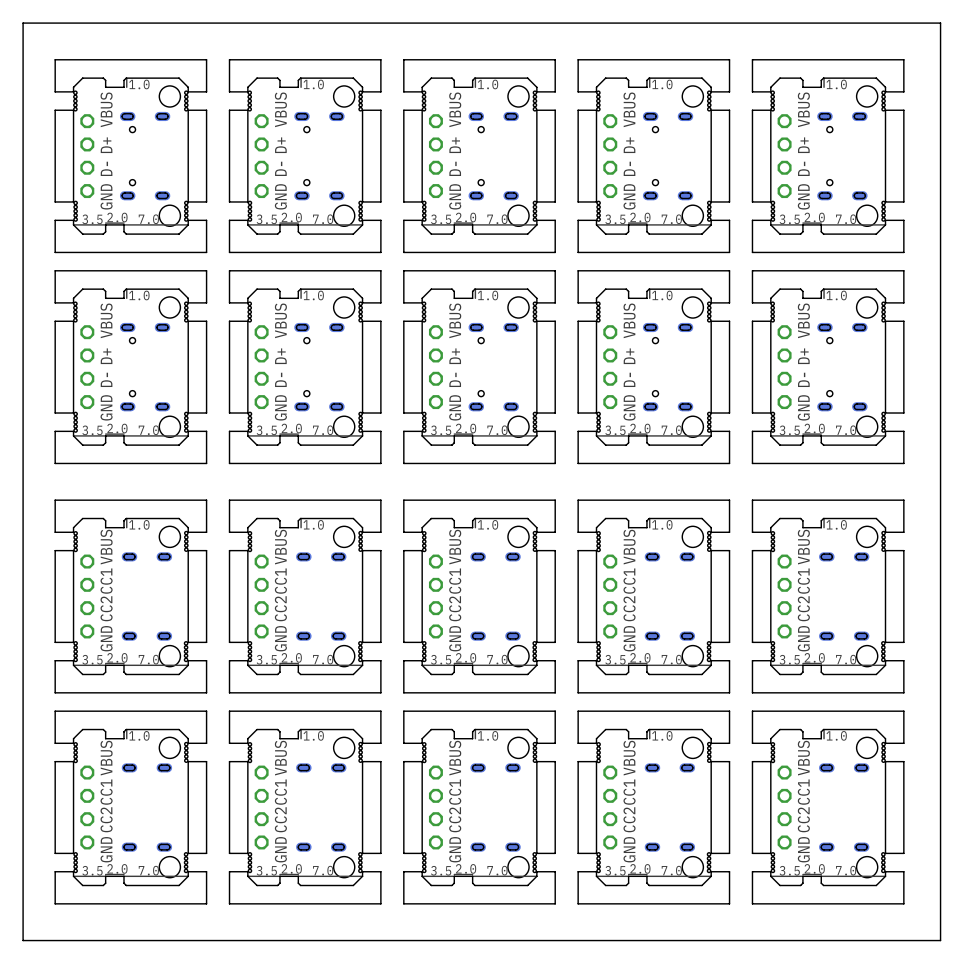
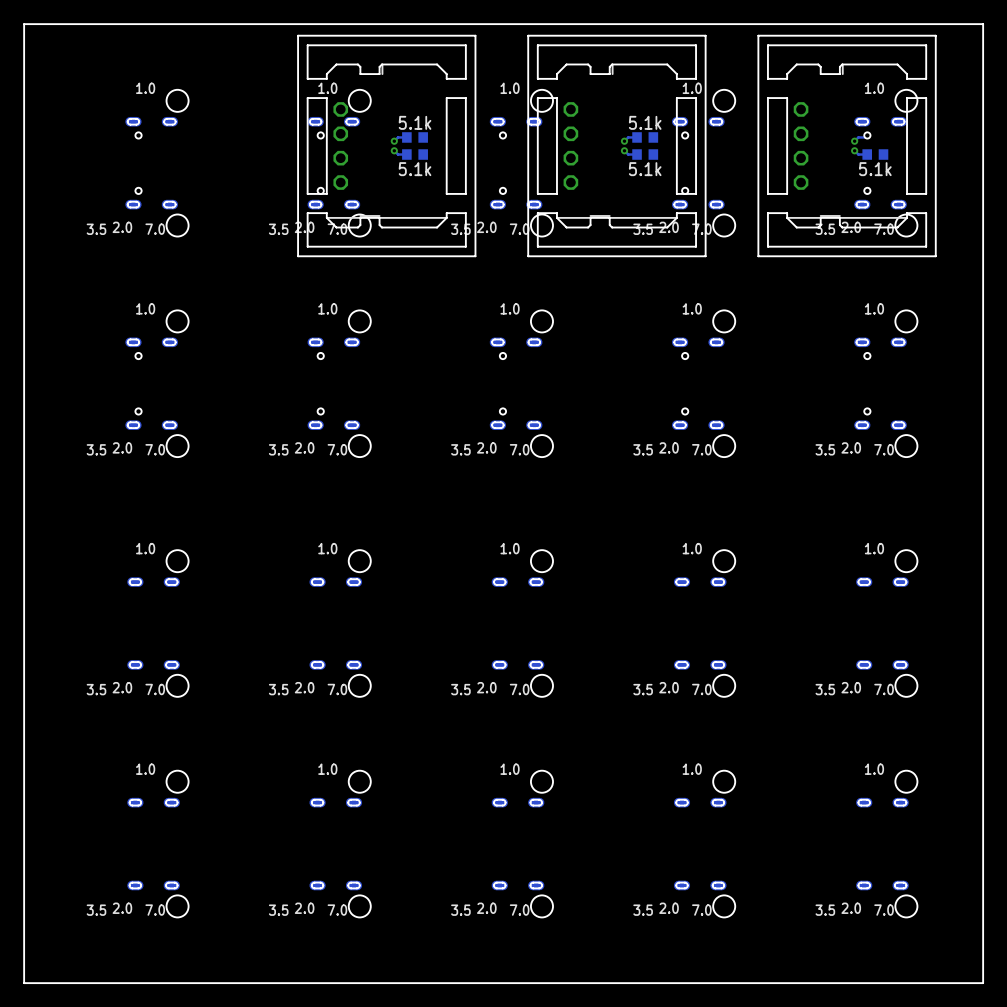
board edge: none -> (475, 35) (298, 35) (298, 256) (475, 256) (475, 35)
board edge: none -> (705, 35) (528, 35) (528, 256) (705, 256) (705, 35)
board edge: none -> (935, 35) (758, 35) (758, 256) (935, 256) (935, 35)
board edge: (206, 59) (55, 59) (55, 91) (73, 91) (73, 87) (82, 78) (103, 78) (105, 80) (105, 87) (124, 87) (124, 80) (126, 78) (179, 78) (188, 87) (188, 91) (206, 91) (206, 59) -> none
board edge: (380, 59) (229, 59) (229, 91) (247, 91) (247, 87) (257, 78) (277, 78) (279, 80) (279, 87) (298, 87) (298, 80) (300, 78) (353, 78) (362, 87) (362, 91) (380, 91) (380, 59) -> (465, 45) (307, 45) (307, 78) (326, 78) (326, 74) (336, 64) (357, 64) (360, 66) (360, 74) (379, 74) (379, 66) (381, 64) (437, 64) (446, 74) (446, 78) (465, 78) (465, 45)
board edge: (555, 59) (403, 59) (403, 91) (422, 91) (422, 87) (431, 78) (451, 78) (454, 80) (454, 87) (472, 87) (472, 80) (474, 78) (527, 78) (536, 87) (536, 91) (555, 91) (555, 59) -> none
board edge: (729, 59) (578, 59) (578, 91) (596, 91) (596, 87) (605, 78) (626, 78) (628, 80) (628, 87) (646, 87) (646, 80) (649, 78) (702, 78) (711, 87) (711, 91) (729, 91) (729, 59) -> (696, 45) (537, 45) (537, 78) (556, 78) (556, 74) (566, 64) (588, 64) (590, 66) (590, 74) (609, 74) (609, 66) (612, 64) (667, 64) (676, 74) (676, 78) (696, 78) (696, 45)
board edge: (903, 59) (903, 91) (885, 91) (885, 87) (876, 78) (823, 78) (821, 80) (821, 87) (802, 87) (802, 80) (800, 78) (779, 78) (770, 87) (770, 91) (752, 91) (752, 59) (903, 59) -> (926, 45) (926, 78) (907, 78) (907, 74) (897, 64) (842, 64) (839, 66) (839, 74) (820, 74) (820, 66) (818, 64) (796, 64) (787, 74) (787, 78) (767, 78) (767, 45) (926, 45)
line: (126, 78) (126, 87) -> none
line: (301, 78) (301, 87) -> (382, 64) (382, 74)
line: (475, 78) (475, 87) -> none
line: (649, 78) (649, 87) -> (612, 64) (612, 74)
line: (824, 78) (824, 87) -> (842, 64) (842, 74)
hole: (75, 92) -> none
hole: (186, 92) -> none
hole: (249, 92) -> none
hole: (360, 92) -> none
hole: (424, 92) -> none
hole: (534, 92) -> none
hole: (598, 92) -> none
hole: (709, 92) -> none
hole: (772, 92) -> none
hole: (883, 92) -> none
hole: (75, 96) -> none
hole: (186, 96) -> none
hole: (249, 96) -> none
hole: (360, 96) -> none
hole: (424, 96) -> none
hole: (534, 96) -> none
hole: (598, 96) -> none
hole: (709, 96) -> none
hole: (772, 96) -> none
hole: (883, 96) -> none
hole: (75, 101) -> none
hole: (186, 101) -> none
hole: (249, 101) -> none
hole: (360, 101) -> none
hole: (424, 101) -> none
hole: (534, 101) -> none
hole: (598, 101) -> none
hole: (709, 101) -> none
hole: (772, 101) -> none
hole: (883, 101) -> none
hole: (75, 105) -> none
hole: (186, 105) -> none
hole: (249, 105) -> none
hole: (360, 105) -> none
hole: (424, 105) -> none
hole: (534, 105) -> none
hole: (598, 105) -> none
hole: (709, 105) -> none
hole: (772, 105) -> none
hole: (883, 105) -> none
hole: (75, 109) -> none
text: VBUS (106, 109) -> none
hole: (186, 109) -> none
hole: (249, 109) -> none
text: VBUS (280, 109) -> none
hole: (360, 109) -> none
hole: (424, 109) -> none
text: VBUS (455, 109) -> none
hole: (534, 109) -> none
hole: (598, 109) -> none
text: VBUS (629, 109) -> none
hole: (709, 109) -> none
hole: (772, 109) -> none
text: VBUS (803, 109) -> none
hole: (883, 109) -> none
board edge: (73, 110) (55, 110) (55, 201) (73, 201) (73, 110) -> none
board edge: (206, 110) (188, 110) (188, 201) (206, 201) (206, 110) -> none
board edge: (247, 110) (229, 110) (229, 201) (247, 201) (247, 110) -> (326, 98) (307, 98) (307, 193) (326, 193) (326, 98)
board edge: (380, 110) (362, 110) (362, 201) (380, 201) (380, 110) -> (465, 98) (446, 98) (446, 193) (465, 193) (465, 98)
board edge: (422, 110) (403, 110) (403, 201) (422, 201) (422, 110) -> none
board edge: (555, 110) (536, 110) (536, 201) (555, 201) (555, 110) -> none
board edge: (596, 110) (578, 110) (578, 201) (596, 201) (596, 110) -> (556, 98) (537, 98) (537, 193) (556, 193) (556, 98)
board edge: (729, 110) (711, 110) (711, 201) (729, 201) (729, 110) -> (696, 98) (676, 98) (676, 193) (696, 193) (696, 98)
board edge: (770, 110) (770, 201) (752, 201) (752, 110) (770, 110) -> (787, 98) (787, 193) (767, 193) (767, 98) (787, 98)
board edge: (903, 110) (903, 201) (885, 201) (885, 110) (903, 110) -> (926, 98) (926, 193) (907, 193) (907, 98) (926, 98)
track: none -> (406, 137) (398, 137) (394, 141)
part: none -> 5.1k (415, 137)
track: none -> (637, 137) (628, 137) (624, 141)
part: none -> 5.1k (645, 137)
track: none -> (867, 137) (858, 137) (854, 141)
via: none -> (394, 141)
via: none -> (624, 141)
via: none -> (854, 141)
part: none -> (340, 145)
part: none -> (570, 145)
track: none -> (394, 150) (398, 154) (406, 154)
via: none -> (394, 150)
track: none -> (624, 150) (628, 154) (637, 154)
via: none -> (624, 150)
track: none -> (854, 150) (858, 154) (867, 154)
via: none -> (854, 150)
text: D+ (106, 145) -> none
text: D+ (280, 145) -> none
text: D+ (455, 145) -> none
text: D+ (629, 145) -> none
text: D+ (803, 145) -> none
part: none -> 5.1k (415, 154)
part: none -> 5.1k (645, 154)
part: none -> 5.1k (875, 154)
part: (87, 156) -> none
part: (261, 156) -> none
part: (435, 156) -> none
part: (610, 156) -> none
part position: (784, 156) -> (801, 145)
text: D- (106, 168) -> none
text: D- (280, 168) -> none
text: D- (455, 168) -> none
text: D- (629, 168) -> none
text: D- (803, 168) -> none
text: GND (106, 196) -> none
text: GND (280, 196) -> none
text: GND (455, 196) -> none
text: GND (629, 196) -> none
text: GND (803, 196) -> none
hole: (75, 202) -> none
hole: (186, 202) -> none
hole: (249, 202) -> none
hole: (360, 202) -> none
hole: (424, 202) -> none
hole: (534, 202) -> none
hole: (598, 202) -> none
hole: (709, 202) -> none
hole: (772, 202) -> none
hole: (883, 202) -> none
hole: (75, 207) -> none
hole: (186, 207) -> none
hole: (249, 207) -> none
hole: (360, 207) -> none
hole: (424, 207) -> none
hole: (534, 207) -> none
hole: (598, 207) -> none
hole: (709, 207) -> none
hole: (772, 207) -> none
hole: (883, 207) -> none
hole: (75, 211) -> none
hole: (186, 211) -> none
hole: (249, 211) -> none
hole: (360, 211) -> none
hole: (424, 211) -> none
hole: (534, 211) -> none
hole: (598, 211) -> none
hole: (709, 211) -> none
hole: (772, 211) -> none
hole: (883, 211) -> none
hole: (75, 215) -> none
hole: (186, 215) -> none
hole: (249, 215) -> none
hole: (360, 215) -> none
hole: (424, 215) -> none
hole: (534, 215) -> none
hole: (598, 215) -> none
hole: (709, 215) -> none
hole: (772, 215) -> none
hole: (883, 215) -> none
hole: (75, 219) -> none
hole: (186, 219) -> none
hole: (249, 219) -> none
hole: (360, 219) -> none
hole: (424, 219) -> none
hole: (534, 219) -> none
hole: (598, 219) -> none
hole: (709, 219) -> none
hole: (772, 219) -> none
hole: (883, 219) -> none
board edge: (206, 220) (188, 220) (188, 224) (179, 234) (126, 234) (124, 231) (124, 224) (105, 224) (105, 231) (103, 234) (82, 234) (73, 224) (73, 220) (55, 220) (55, 252) (206, 252) (206, 220) -> none
board edge: (380, 220) (362, 220) (362, 224) (353, 234) (300, 234) (298, 231) (298, 224) (279, 224) (279, 231) (277, 234) (257, 234) (247, 224) (247, 220) (229, 220) (229, 252) (380, 252) (380, 220) -> (465, 213) (446, 213) (446, 217) (437, 227) (381, 227) (379, 225) (379, 217) (360, 217) (360, 225) (357, 227) (336, 227) (326, 217) (326, 213) (307, 213) (307, 246) (465, 246) (465, 213)
board edge: (555, 220) (536, 220) (536, 224) (527, 234) (474, 234) (472, 231) (472, 224) (454, 224) (454, 231) (451, 234) (431, 234) (422, 224) (422, 220) (403, 220) (403, 252) (555, 252) (555, 220) -> none
board edge: (729, 220) (711, 220) (711, 224) (702, 234) (649, 234) (646, 231) (646, 224) (628, 224) (628, 231) (626, 234) (605, 234) (596, 224) (596, 220) (578, 220) (578, 252) (729, 252) (729, 220) -> (696, 213) (676, 213) (676, 217) (667, 227) (612, 227) (609, 225) (609, 217) (590, 217) (590, 225) (588, 227) (566, 227) (556, 217) (556, 213) (537, 213) (537, 246) (696, 246) (696, 213)
board edge: (903, 220) (903, 252) (752, 252) (752, 220) (770, 220) (770, 224) (779, 234) (800, 234) (802, 231) (802, 224) (821, 224) (821, 231) (823, 234) (876, 234) (885, 224) (885, 220) (903, 220) -> (926, 213) (926, 246) (767, 246) (767, 213) (787, 213) (787, 217) (796, 227) (818, 227) (820, 225) (820, 217) (839, 217) (839, 225) (842, 227) (897, 227) (907, 217) (907, 213) (926, 213)
line: (124, 223) (105, 223) -> none
line: (298, 223) (279, 223) -> (379, 216) (360, 216)
line: (472, 223) (454, 223) -> none
line: (646, 223) (628, 223) -> (609, 216) (590, 216)
line: (821, 223) (802, 223) -> (839, 216) (820, 216)
line: (105, 224) (73, 224) -> none
line: (188, 224) (124, 224) -> none
line: (279, 224) (247, 224) -> (360, 217) (326, 217)
line: (362, 224) (298, 224) -> (446, 217) (379, 217)
line: (454, 224) (422, 224) -> none
line: (536, 224) (472, 224) -> none
line: (628, 224) (596, 224) -> (590, 217) (556, 217)
line: (711, 224) (646, 224) -> (676, 217) (609, 217)
line: (802, 224) (770, 224) -> (820, 217) (787, 217)
line: (885, 224) (821, 224) -> (907, 217) (839, 217)
board edge: (206, 270) (206, 302) (188, 302) (188, 298) (179, 289) (126, 289) (124, 291) (124, 298) (105, 298) (105, 291) (103, 289) (82, 289) (73, 298) (73, 302) (55, 302) (55, 270) (206, 270) -> none
board edge: (380, 270) (380, 302) (362, 302) (362, 298) (353, 289) (300, 289) (298, 291) (298, 298) (279, 298) (279, 291) (277, 289) (257, 289) (247, 298) (247, 302) (229, 302) (229, 270) (380, 270) -> none
board edge: (555, 270) (555, 302) (536, 302) (536, 298) (527, 289) (474, 289) (472, 291) (472, 298) (454, 298) (454, 291) (451, 289) (431, 289) (422, 298) (422, 302) (403, 302) (403, 270) (555, 270) -> none
board edge: (729, 270) (729, 302) (711, 302) (711, 298) (702, 289) (649, 289) (646, 291) (646, 298) (628, 298) (628, 291) (626, 289) (605, 289) (596, 298) (596, 302) (578, 302) (578, 270) (729, 270) -> none
board edge: (903, 270) (903, 302) (885, 302) (885, 298) (876, 289) (823, 289) (821, 291) (821, 298) (802, 298) (802, 291) (800, 289) (779, 289) (770, 298) (770, 302) (752, 302) (752, 270) (903, 270) -> none
line: (126, 289) (126, 298) -> none
line: (301, 289) (301, 298) -> none
line: (475, 289) (475, 298) -> none
line: (649, 289) (649, 298) -> none
line: (824, 289) (824, 298) -> none
hole: (75, 303) -> none
hole: (186, 303) -> none
hole: (249, 303) -> none
hole: (360, 303) -> none
hole: (424, 303) -> none
hole: (534, 303) -> none
hole: (598, 303) -> none
hole: (709, 303) -> none
hole: (772, 303) -> none
hole: (883, 303) -> none
hole: (75, 307) -> none
hole: (186, 307) -> none
hole: (249, 307) -> none
hole: (360, 307) -> none
hole: (424, 307) -> none
hole: (534, 307) -> none
hole: (598, 307) -> none
hole: (709, 307) -> none
hole: (772, 307) -> none
hole: (883, 307) -> none
hole: (75, 312) -> none
hole: (186, 312) -> none
hole: (249, 312) -> none
hole: (360, 312) -> none
hole: (424, 312) -> none
hole: (534, 312) -> none
hole: (598, 312) -> none
hole: (709, 312) -> none
hole: (772, 312) -> none
hole: (883, 312) -> none
hole: (75, 316) -> none
hole: (186, 316) -> none
hole: (249, 316) -> none
hole: (360, 316) -> none
hole: (424, 316) -> none
hole: (534, 316) -> none
hole: (598, 316) -> none
hole: (709, 316) -> none
hole: (772, 316) -> none
hole: (883, 316) -> none
hole: (75, 320) -> none
text: VBUS (106, 320) -> none
hole: (186, 320) -> none
hole: (249, 320) -> none
text: VBUS (280, 320) -> none
hole: (360, 320) -> none
hole: (424, 320) -> none
text: VBUS (455, 320) -> none
hole: (534, 320) -> none
hole: (598, 320) -> none
text: VBUS (629, 320) -> none
hole: (709, 320) -> none
hole: (772, 320) -> none
text: VBUS (803, 320) -> none
hole: (883, 320) -> none
board edge: (73, 321) (73, 413) (55, 413) (55, 321) (73, 321) -> none
board edge: (206, 321) (206, 413) (188, 413) (188, 321) (206, 321) -> none
board edge: (247, 321) (247, 413) (229, 413) (229, 321) (247, 321) -> none
board edge: (380, 321) (380, 413) (362, 413) (362, 321) (380, 321) -> none
board edge: (422, 321) (422, 413) (403, 413) (403, 321) (422, 321) -> none
board edge: (555, 321) (555, 413) (536, 413) (536, 321) (555, 321) -> none
board edge: (596, 321) (596, 413) (578, 413) (578, 321) (596, 321) -> none
board edge: (729, 321) (729, 413) (711, 413) (711, 321) (729, 321) -> none
board edge: (770, 321) (770, 413) (752, 413) (752, 321) (770, 321) -> none
board edge: (903, 321) (903, 413) (885, 413) (885, 321) (903, 321) -> none
text: D+ (106, 356) -> none
text: D+ (280, 356) -> none
text: D+ (455, 356) -> none
text: D+ (629, 356) -> none
text: D+ (803, 356) -> none
part: (87, 367) -> none
part: (261, 367) -> none
part: (435, 367) -> none
part: (610, 367) -> none
part: (784, 367) -> none
text: D- (106, 379) -> none
text: D- (280, 379) -> none
text: D- (455, 379) -> none
text: D- (629, 379) -> none
text: D- (803, 379) -> none
text: GND (106, 407) -> none
text: GND (280, 407) -> none
text: GND (455, 407) -> none
text: GND (629, 407) -> none
text: GND (803, 407) -> none
hole: (75, 413) -> none
hole: (186, 413) -> none
hole: (249, 413) -> none
hole: (360, 413) -> none
hole: (424, 413) -> none
hole: (534, 413) -> none
hole: (598, 413) -> none
hole: (709, 413) -> none
hole: (772, 413) -> none
hole: (883, 413) -> none
hole: (75, 418) -> none
hole: (186, 418) -> none
hole: (249, 418) -> none
hole: (360, 418) -> none
hole: (424, 418) -> none
hole: (534, 418) -> none
hole: (598, 418) -> none
hole: (709, 418) -> none
hole: (772, 418) -> none
hole: (883, 418) -> none
hole: (75, 422) -> none
hole: (186, 422) -> none
hole: (249, 422) -> none
hole: (360, 422) -> none
hole: (424, 422) -> none
hole: (534, 422) -> none
hole: (598, 422) -> none
hole: (709, 422) -> none
hole: (772, 422) -> none
hole: (883, 422) -> none
hole: (75, 426) -> none
hole: (186, 426) -> none
hole: (249, 426) -> none
hole: (360, 426) -> none
hole: (424, 426) -> none
hole: (534, 426) -> none
hole: (598, 426) -> none
hole: (709, 426) -> none
hole: (772, 426) -> none
hole: (883, 426) -> none
hole: (75, 430) -> none
hole: (186, 430) -> none
hole: (249, 430) -> none
hole: (360, 430) -> none
hole: (424, 430) -> none
hole: (534, 430) -> none
hole: (598, 430) -> none
hole: (709, 430) -> none
hole: (772, 430) -> none
hole: (883, 430) -> none
board edge: (206, 431) (206, 463) (55, 463) (55, 431) (73, 431) (73, 435) (82, 445) (103, 445) (105, 442) (105, 435) (124, 435) (124, 442) (126, 445) (179, 445) (188, 435) (188, 431) (206, 431) -> none
board edge: (380, 431) (380, 463) (229, 463) (229, 431) (247, 431) (247, 435) (257, 445) (277, 445) (279, 442) (279, 435) (298, 435) (298, 442) (300, 445) (353, 445) (362, 435) (362, 431) (380, 431) -> none
board edge: (555, 431) (555, 463) (403, 463) (403, 431) (422, 431) (422, 435) (431, 445) (451, 445) (454, 442) (454, 435) (472, 435) (472, 442) (474, 445) (527, 445) (536, 435) (536, 431) (555, 431) -> none
board edge: (729, 431) (729, 463) (578, 463) (578, 431) (596, 431) (596, 435) (605, 445) (626, 445) (628, 442) (628, 435) (646, 435) (646, 442) (649, 445) (702, 445) (711, 435) (711, 431) (729, 431) -> none
board edge: (903, 431) (903, 463) (752, 463) (752, 431) (770, 431) (770, 435) (779, 445) (800, 445) (802, 442) (802, 435) (821, 435) (821, 442) (823, 445) (876, 445) (885, 435) (885, 431) (903, 431) -> none
line: (124, 434) (105, 434) -> none
line: (298, 434) (279, 434) -> none
line: (472, 434) (454, 434) -> none
line: (646, 434) (628, 434) -> none
line: (821, 434) (802, 434) -> none
line: (105, 435) (73, 435) -> none
line: (188, 435) (124, 435) -> none
line: (279, 435) (247, 435) -> none
line: (362, 435) (298, 435) -> none
line: (454, 435) (422, 435) -> none
line: (536, 435) (472, 435) -> none
line: (628, 435) (596, 435) -> none
line: (711, 435) (646, 435) -> none
line: (802, 435) (770, 435) -> none
line: (885, 435) (821, 435) -> none
board edge: (206, 500) (206, 532) (188, 532) (188, 527) (179, 518) (126, 518) (124, 520) (124, 527) (105, 527) (105, 520) (103, 518) (82, 518) (73, 527) (73, 532) (55, 532) (55, 500) (206, 500) -> none
board edge: (380, 500) (380, 532) (362, 532) (362, 527) (353, 518) (300, 518) (298, 520) (298, 527) (279, 527) (279, 520) (277, 518) (257, 518) (247, 527) (247, 532) (229, 532) (229, 500) (380, 500) -> none
board edge: (555, 500) (555, 532) (536, 532) (536, 527) (527, 518) (474, 518) (472, 520) (472, 527) (454, 527) (454, 520) (451, 518) (431, 518) (422, 527) (422, 532) (403, 532) (403, 500) (555, 500) -> none
board edge: (729, 500) (729, 532) (711, 532) (711, 527) (702, 518) (649, 518) (646, 520) (646, 527) (628, 527) (628, 520) (626, 518) (605, 518) (596, 527) (596, 532) (578, 532) (578, 500) (729, 500) -> none
board edge: (903, 500) (903, 532) (885, 532) (885, 527) (876, 518) (823, 518) (821, 520) (821, 527) (802, 527) (802, 520) (800, 518) (779, 518) (770, 527) (770, 532) (752, 532) (752, 500) (903, 500) -> none
line: (126, 518) (126, 527) -> none
line: (301, 518) (301, 527) -> none
line: (475, 518) (475, 527) -> none
line: (649, 518) (649, 527) -> none
line: (824, 518) (824, 527) -> none
hole: (75, 533) -> none
hole: (186, 533) -> none
hole: (249, 533) -> none
hole: (360, 533) -> none
hole: (424, 533) -> none
hole: (534, 533) -> none
hole: (598, 533) -> none
hole: (709, 533) -> none
hole: (772, 533) -> none
hole: (883, 533) -> none
hole: (75, 537) -> none
hole: (186, 537) -> none
hole: (249, 537) -> none
hole: (360, 537) -> none
hole: (424, 537) -> none
hole: (534, 537) -> none
hole: (598, 537) -> none
hole: (709, 537) -> none
hole: (772, 537) -> none
hole: (883, 537) -> none
hole: (75, 541) -> none
hole: (186, 541) -> none
hole: (249, 541) -> none
hole: (360, 541) -> none
hole: (424, 541) -> none
hole: (534, 541) -> none
hole: (598, 541) -> none
hole: (709, 541) -> none
hole: (772, 541) -> none
hole: (883, 541) -> none
hole: (75, 545) -> none
hole: (186, 545) -> none
hole: (249, 545) -> none
hole: (360, 545) -> none
hole: (424, 545) -> none
hole: (534, 545) -> none
hole: (598, 545) -> none
hole: (709, 545) -> none
hole: (772, 545) -> none
hole: (883, 545) -> none
text: VBUS (106, 547) -> none
text: VBUS (280, 547) -> none
text: VBUS (455, 547) -> none
text: VBUS (629, 547) -> none
text: VBUS (803, 547) -> none
hole: (75, 549) -> none
hole: (186, 549) -> none
hole: (249, 549) -> none
hole: (360, 549) -> none
hole: (424, 549) -> none
hole: (534, 549) -> none
hole: (598, 549) -> none
hole: (709, 549) -> none
hole: (772, 549) -> none
hole: (883, 549) -> none
board edge: (73, 550) (73, 642) (55, 642) (55, 550) (73, 550) -> none
board edge: (206, 550) (206, 642) (188, 642) (188, 550) (206, 550) -> none
board edge: (247, 550) (247, 642) (229, 642) (229, 550) (247, 550) -> none
board edge: (380, 550) (380, 642) (362, 642) (362, 550) (380, 550) -> none
board edge: (422, 550) (422, 642) (403, 642) (403, 550) (422, 550) -> none
board edge: (555, 550) (555, 642) (536, 642) (536, 550) (555, 550) -> none
board edge: (596, 550) (596, 642) (578, 642) (578, 550) (596, 550) -> none
board edge: (729, 550) (729, 642) (711, 642) (711, 550) (729, 550) -> none
board edge: (770, 550) (770, 642) (752, 642) (752, 550) (770, 550) -> none
board edge: (903, 550) (903, 642) (885, 642) (885, 550) (903, 550) -> none
text: CC1 (106, 581) -> none
text: CC1 (280, 581) -> none
text: CC1 (455, 581) -> none
text: CC1 (629, 581) -> none
text: CC1 (803, 581) -> none
part: (87, 596) -> none
part: (261, 596) -> none
part: (435, 596) -> none
part: (610, 596) -> none
part: (784, 596) -> none
text: CC2 (106, 608) -> none
text: CC2 (280, 608) -> none
text: CC2 (455, 608) -> none
text: CC2 (629, 608) -> none
text: CC2 (803, 608) -> none
text: GND (106, 638) -> none
text: GND (280, 638) -> none
text: GND (455, 638) -> none
text: GND (629, 638) -> none
text: GND (803, 638) -> none
hole: (75, 643) -> none
hole: (186, 643) -> none
hole: (249, 643) -> none
hole: (360, 643) -> none
hole: (424, 643) -> none
hole: (534, 643) -> none
hole: (598, 643) -> none
hole: (709, 643) -> none
hole: (772, 643) -> none
hole: (883, 643) -> none
hole: (75, 647) -> none
hole: (186, 647) -> none
hole: (249, 647) -> none
hole: (360, 647) -> none
hole: (424, 647) -> none
hole: (534, 647) -> none
hole: (598, 647) -> none
hole: (709, 647) -> none
hole: (772, 647) -> none
hole: (883, 647) -> none
hole: (75, 651) -> none
hole: (186, 651) -> none
hole: (249, 651) -> none
hole: (360, 651) -> none
hole: (424, 651) -> none
hole: (534, 651) -> none
hole: (598, 651) -> none
hole: (709, 651) -> none
hole: (772, 651) -> none
hole: (883, 651) -> none
hole: (75, 655) -> none
hole: (186, 655) -> none
hole: (249, 655) -> none
hole: (360, 655) -> none
hole: (424, 655) -> none
hole: (534, 655) -> none
hole: (598, 655) -> none
hole: (709, 655) -> none
hole: (772, 655) -> none
hole: (883, 655) -> none
hole: (75, 659) -> none
hole: (186, 659) -> none
hole: (249, 659) -> none
hole: (360, 659) -> none
hole: (424, 659) -> none
hole: (534, 659) -> none
hole: (598, 659) -> none
hole: (709, 659) -> none
hole: (772, 659) -> none
hole: (883, 659) -> none
board edge: (206, 660) (206, 692) (55, 692) (55, 660) (73, 660) (73, 665) (82, 674) (103, 674) (105, 672) (105, 665) (124, 665) (124, 672) (126, 674) (179, 674) (188, 665) (188, 660) (206, 660) -> none
board edge: (380, 660) (380, 692) (229, 692) (229, 660) (247, 660) (247, 665) (257, 674) (277, 674) (279, 672) (279, 665) (298, 665) (298, 672) (300, 674) (353, 674) (362, 665) (362, 660) (380, 660) -> none
board edge: (555, 660) (555, 692) (403, 692) (403, 660) (422, 660) (422, 665) (431, 674) (451, 674) (454, 672) (454, 665) (472, 665) (472, 672) (474, 674) (527, 674) (536, 665) (536, 660) (555, 660) -> none
board edge: (729, 660) (729, 692) (578, 692) (578, 660) (596, 660) (596, 665) (605, 674) (626, 674) (628, 672) (628, 665) (646, 665) (646, 672) (649, 674) (702, 674) (711, 665) (711, 660) (729, 660) -> none
board edge: (903, 660) (903, 692) (752, 692) (752, 660) (770, 660) (770, 665) (779, 674) (800, 674) (802, 672) (802, 665) (821, 665) (821, 672) (823, 674) (876, 674) (885, 665) (885, 660) (903, 660) -> none
line: (124, 663) (105, 663) -> none
line: (298, 663) (279, 663) -> none
line: (472, 663) (454, 663) -> none
line: (646, 663) (628, 663) -> none
line: (821, 663) (802, 663) -> none
line: (105, 665) (73, 665) -> none
line: (188, 665) (124, 665) -> none
line: (279, 665) (247, 665) -> none
line: (362, 665) (298, 665) -> none
line: (454, 665) (422, 665) -> none
line: (536, 665) (472, 665) -> none
line: (628, 665) (596, 665) -> none
line: (711, 665) (646, 665) -> none
line: (802, 665) (770, 665) -> none
line: (885, 665) (821, 665) -> none
board edge: (206, 711) (55, 711) (55, 743) (73, 743) (73, 738) (82, 729) (103, 729) (105, 731) (105, 738) (124, 738) (124, 731) (126, 729) (179, 729) (188, 738) (188, 743) (206, 743) (206, 711) -> none
board edge: (380, 711) (229, 711) (229, 743) (247, 743) (247, 738) (257, 729) (277, 729) (279, 731) (279, 738) (298, 738) (298, 731) (300, 729) (353, 729) (362, 738) (362, 743) (380, 743) (380, 711) -> none
board edge: (555, 711) (403, 711) (403, 743) (422, 743) (422, 738) (431, 729) (451, 729) (454, 731) (454, 738) (472, 738) (472, 731) (474, 729) (527, 729) (536, 738) (536, 743) (555, 743) (555, 711) -> none
board edge: (729, 711) (578, 711) (578, 743) (596, 743) (596, 738) (605, 729) (626, 729) (628, 731) (628, 738) (646, 738) (646, 731) (649, 729) (702, 729) (711, 738) (711, 743) (729, 743) (729, 711) -> none
board edge: (903, 711) (903, 743) (885, 743) (885, 738) (876, 729) (823, 729) (821, 731) (821, 738) (802, 738) (802, 731) (800, 729) (779, 729) (770, 738) (770, 743) (752, 743) (752, 711) (903, 711) -> none
line: (126, 729) (126, 738) -> none
line: (301, 729) (301, 738) -> none
line: (475, 729) (475, 738) -> none
line: (649, 729) (649, 738) -> none
line: (824, 729) (824, 738) -> none
hole: (75, 744) -> none
hole: (186, 744) -> none
hole: (249, 744) -> none
hole: (360, 744) -> none
hole: (424, 744) -> none
hole: (534, 744) -> none
hole: (598, 744) -> none
hole: (709, 744) -> none
hole: (772, 744) -> none
hole: (883, 744) -> none
hole: (75, 748) -> none
hole: (186, 748) -> none
hole: (249, 748) -> none
hole: (360, 748) -> none
hole: (424, 748) -> none
hole: (534, 748) -> none
hole: (598, 748) -> none
hole: (709, 748) -> none
hole: (772, 748) -> none
hole: (883, 748) -> none
hole: (75, 752) -> none
hole: (186, 752) -> none
hole: (249, 752) -> none
hole: (360, 752) -> none
hole: (424, 752) -> none
hole: (534, 752) -> none
hole: (598, 752) -> none
hole: (709, 752) -> none
hole: (772, 752) -> none
hole: (883, 752) -> none
hole: (75, 756) -> none
hole: (186, 756) -> none
hole: (249, 756) -> none
hole: (360, 756) -> none
hole: (424, 756) -> none
hole: (534, 756) -> none
hole: (598, 756) -> none
hole: (709, 756) -> none
hole: (772, 756) -> none
hole: (883, 756) -> none
text: VBUS (106, 758) -> none
text: VBUS (280, 758) -> none
text: VBUS (455, 758) -> none
text: VBUS (629, 758) -> none
text: VBUS (803, 758) -> none
hole: (75, 760) -> none
hole: (186, 760) -> none
hole: (249, 760) -> none
hole: (360, 760) -> none
hole: (424, 760) -> none
hole: (534, 760) -> none
hole: (598, 760) -> none
hole: (709, 760) -> none
hole: (772, 760) -> none
hole: (883, 760) -> none
board edge: (73, 761) (55, 761) (55, 853) (73, 853) (73, 761) -> none
board edge: (206, 761) (188, 761) (188, 853) (206, 853) (206, 761) -> none
board edge: (247, 761) (229, 761) (229, 853) (247, 853) (247, 761) -> none
board edge: (380, 761) (362, 761) (362, 853) (380, 853) (380, 761) -> none
board edge: (422, 761) (403, 761) (403, 853) (422, 853) (422, 761) -> none
board edge: (555, 761) (536, 761) (536, 853) (555, 853) (555, 761) -> none
board edge: (596, 761) (578, 761) (578, 853) (596, 853) (596, 761) -> none
board edge: (729, 761) (711, 761) (711, 853) (729, 853) (729, 761) -> none
board edge: (770, 761) (770, 853) (752, 853) (752, 761) (770, 761) -> none
board edge: (903, 761) (903, 853) (885, 853) (885, 761) (903, 761) -> none
text: CC1 (106, 792) -> none
text: CC1 (280, 792) -> none
text: CC1 (455, 792) -> none
text: CC1 (629, 792) -> none
text: CC1 (803, 792) -> none
part: (87, 807) -> none
part: (261, 807) -> none
part: (435, 807) -> none
part: (610, 807) -> none
part: (784, 807) -> none
text: CC2 (106, 819) -> none
text: CC2 (280, 819) -> none
text: CC2 (455, 819) -> none
text: CC2 (629, 819) -> none
text: CC2 (803, 819) -> none
text: GND (106, 849) -> none
text: GND (280, 849) -> none
text: GND (455, 849) -> none
text: GND (629, 849) -> none
text: GND (803, 849) -> none
hole: (75, 854) -> none
hole: (186, 854) -> none
hole: (249, 854) -> none
hole: (360, 854) -> none
hole: (424, 854) -> none
hole: (534, 854) -> none
hole: (598, 854) -> none
hole: (709, 854) -> none
hole: (772, 854) -> none
hole: (883, 854) -> none
hole: (75, 858) -> none
hole: (186, 858) -> none
hole: (249, 858) -> none
hole: (360, 858) -> none
hole: (424, 858) -> none
hole: (534, 858) -> none
hole: (598, 858) -> none
hole: (709, 858) -> none
hole: (772, 858) -> none
hole: (883, 858) -> none
hole: (75, 862) -> none
hole: (186, 862) -> none
hole: (249, 862) -> none
hole: (360, 862) -> none
hole: (424, 862) -> none
hole: (534, 862) -> none
hole: (598, 862) -> none
hole: (709, 862) -> none
hole: (772, 862) -> none
hole: (883, 862) -> none
hole: (75, 866) -> none
hole: (186, 866) -> none
hole: (249, 866) -> none
hole: (360, 866) -> none
hole: (424, 866) -> none
hole: (534, 866) -> none
hole: (598, 866) -> none
hole: (709, 866) -> none
hole: (772, 866) -> none
hole: (883, 866) -> none
hole: (75, 870) -> none
hole: (186, 870) -> none
hole: (249, 870) -> none
hole: (360, 870) -> none
hole: (424, 870) -> none
hole: (534, 870) -> none
hole: (598, 870) -> none
hole: (709, 870) -> none
hole: (772, 870) -> none
hole: (883, 870) -> none
board edge: (206, 871) (188, 871) (188, 876) (179, 885) (126, 885) (124, 883) (124, 876) (105, 876) (105, 883) (103, 885) (82, 885) (73, 876) (73, 871) (55, 871) (55, 903) (206, 903) (206, 871) -> none
board edge: (380, 871) (362, 871) (362, 876) (353, 885) (300, 885) (298, 883) (298, 876) (279, 876) (279, 883) (277, 885) (257, 885) (247, 876) (247, 871) (229, 871) (229, 903) (380, 903) (380, 871) -> none
board edge: (555, 871) (536, 871) (536, 876) (527, 885) (474, 885) (472, 883) (472, 876) (454, 876) (454, 883) (451, 885) (431, 885) (422, 876) (422, 871) (403, 871) (403, 903) (555, 903) (555, 871) -> none
board edge: (729, 871) (711, 871) (711, 876) (702, 885) (649, 885) (646, 883) (646, 876) (628, 876) (628, 883) (626, 885) (605, 885) (596, 876) (596, 871) (578, 871) (578, 903) (729, 903) (729, 871) -> none
board edge: (903, 871) (903, 903) (752, 903) (752, 871) (770, 871) (770, 876) (779, 885) (800, 885) (802, 883) (802, 876) (821, 876) (821, 883) (823, 885) (876, 885) (885, 876) (885, 871) (903, 871) -> none
line: (124, 874) (105, 874) -> none
line: (298, 874) (279, 874) -> none
line: (472, 874) (454, 874) -> none
line: (646, 874) (628, 874) -> none
line: (821, 874) (802, 874) -> none
line: (105, 876) (73, 876) -> none
line: (188, 876) (124, 876) -> none
line: (279, 876) (247, 876) -> none
line: (362, 876) (298, 876) -> none
line: (454, 876) (422, 876) -> none
line: (536, 876) (472, 876) -> none
line: (628, 876) (596, 876) -> none
line: (711, 876) (646, 876) -> none
line: (802, 876) (770, 876) -> none
line: (885, 876) (821, 876) -> none

